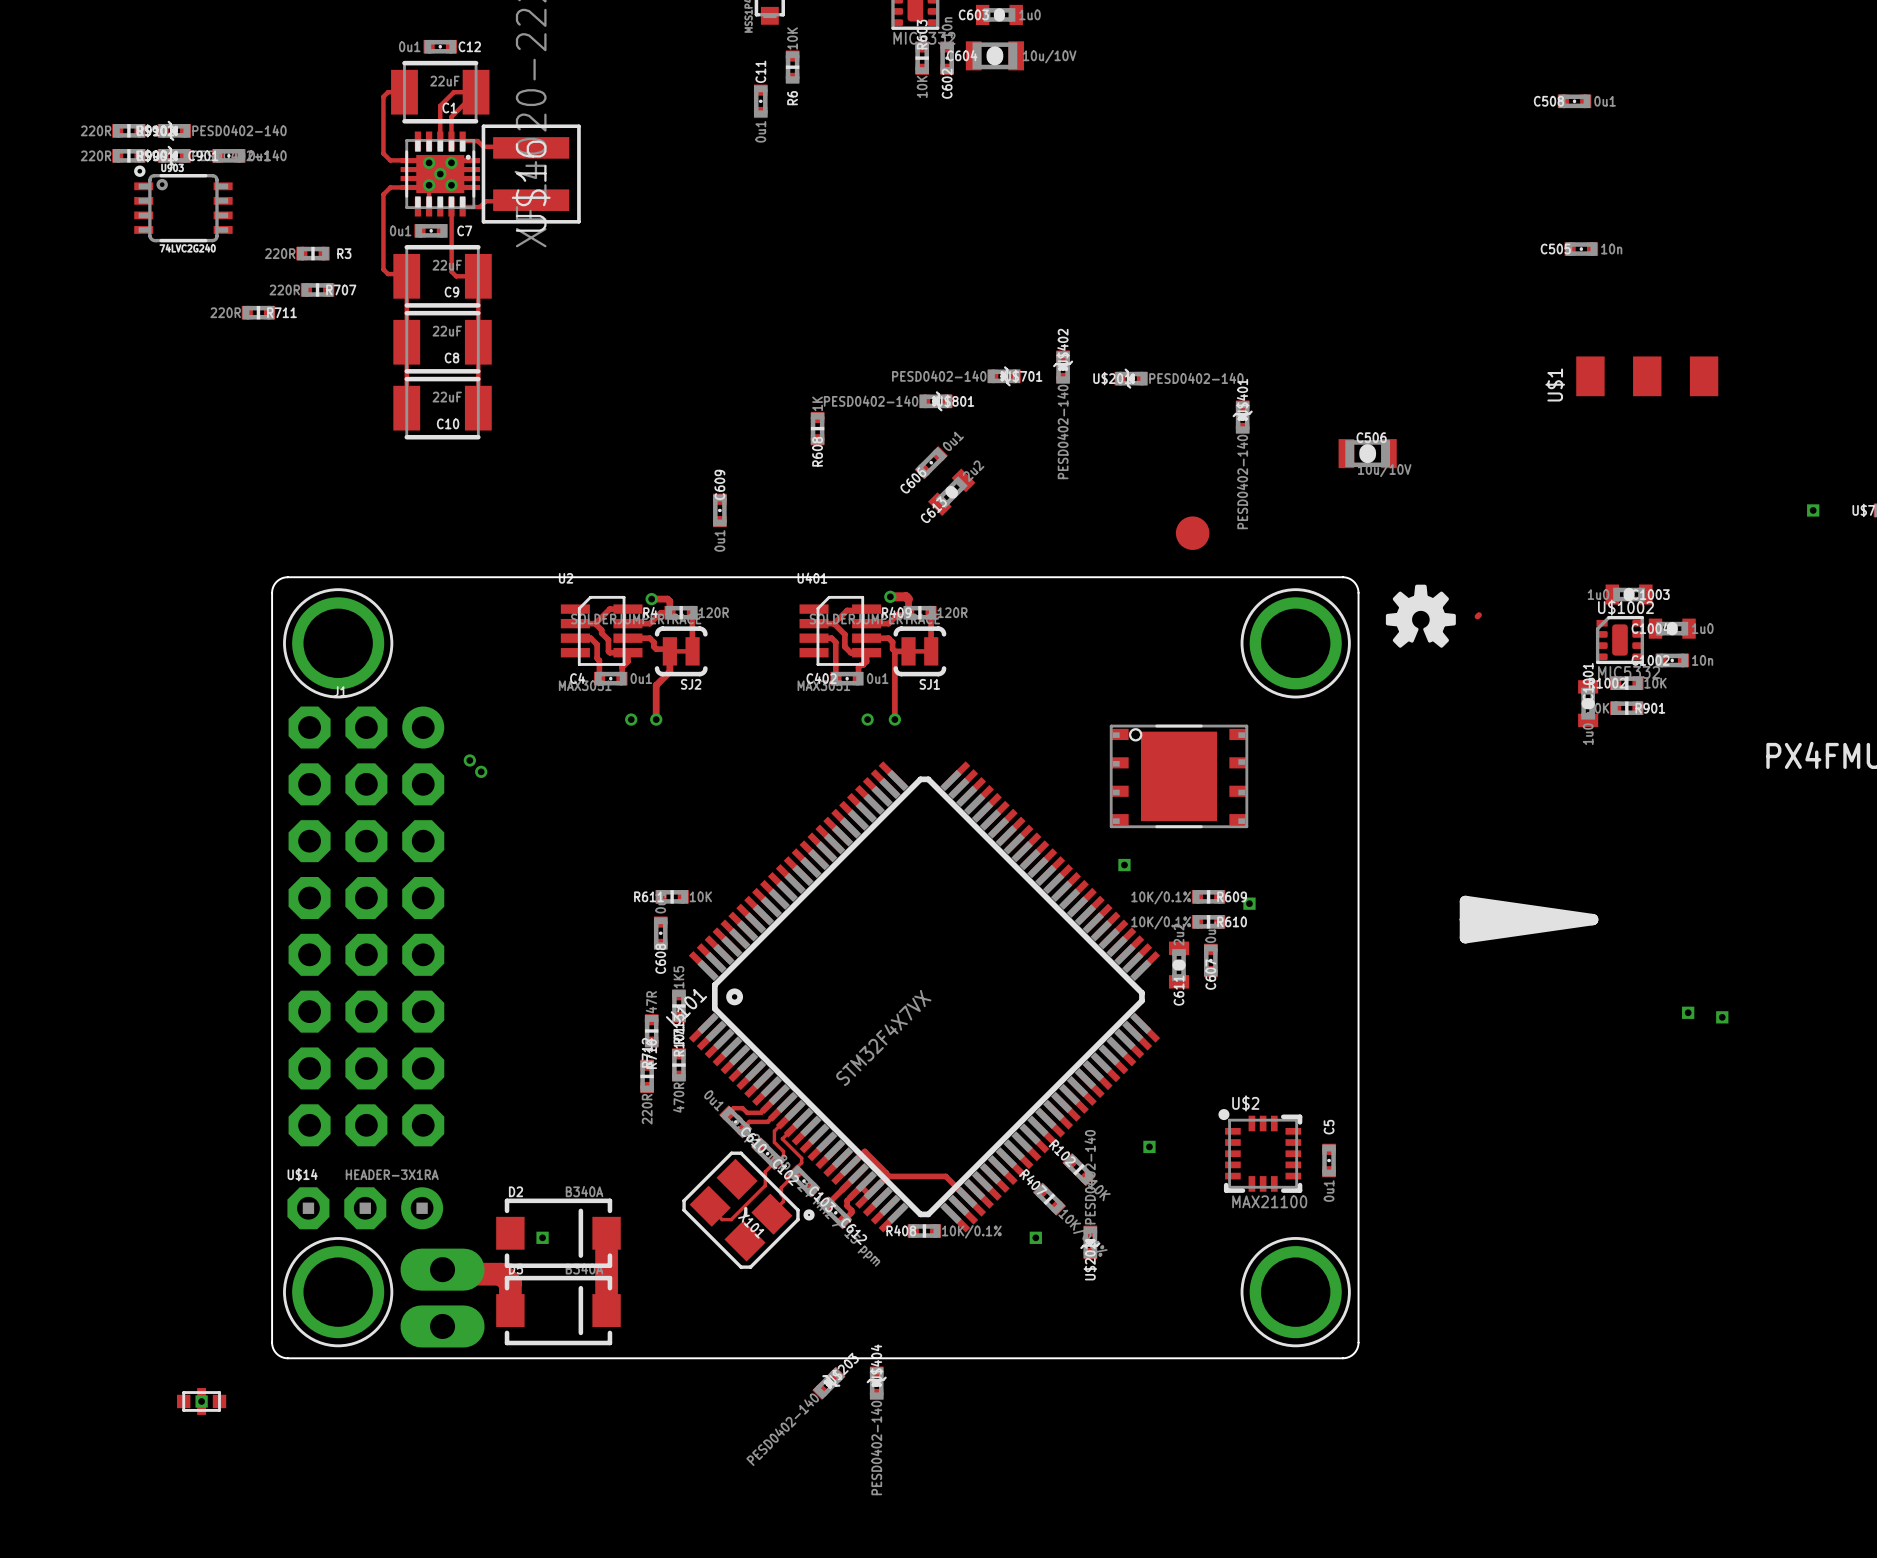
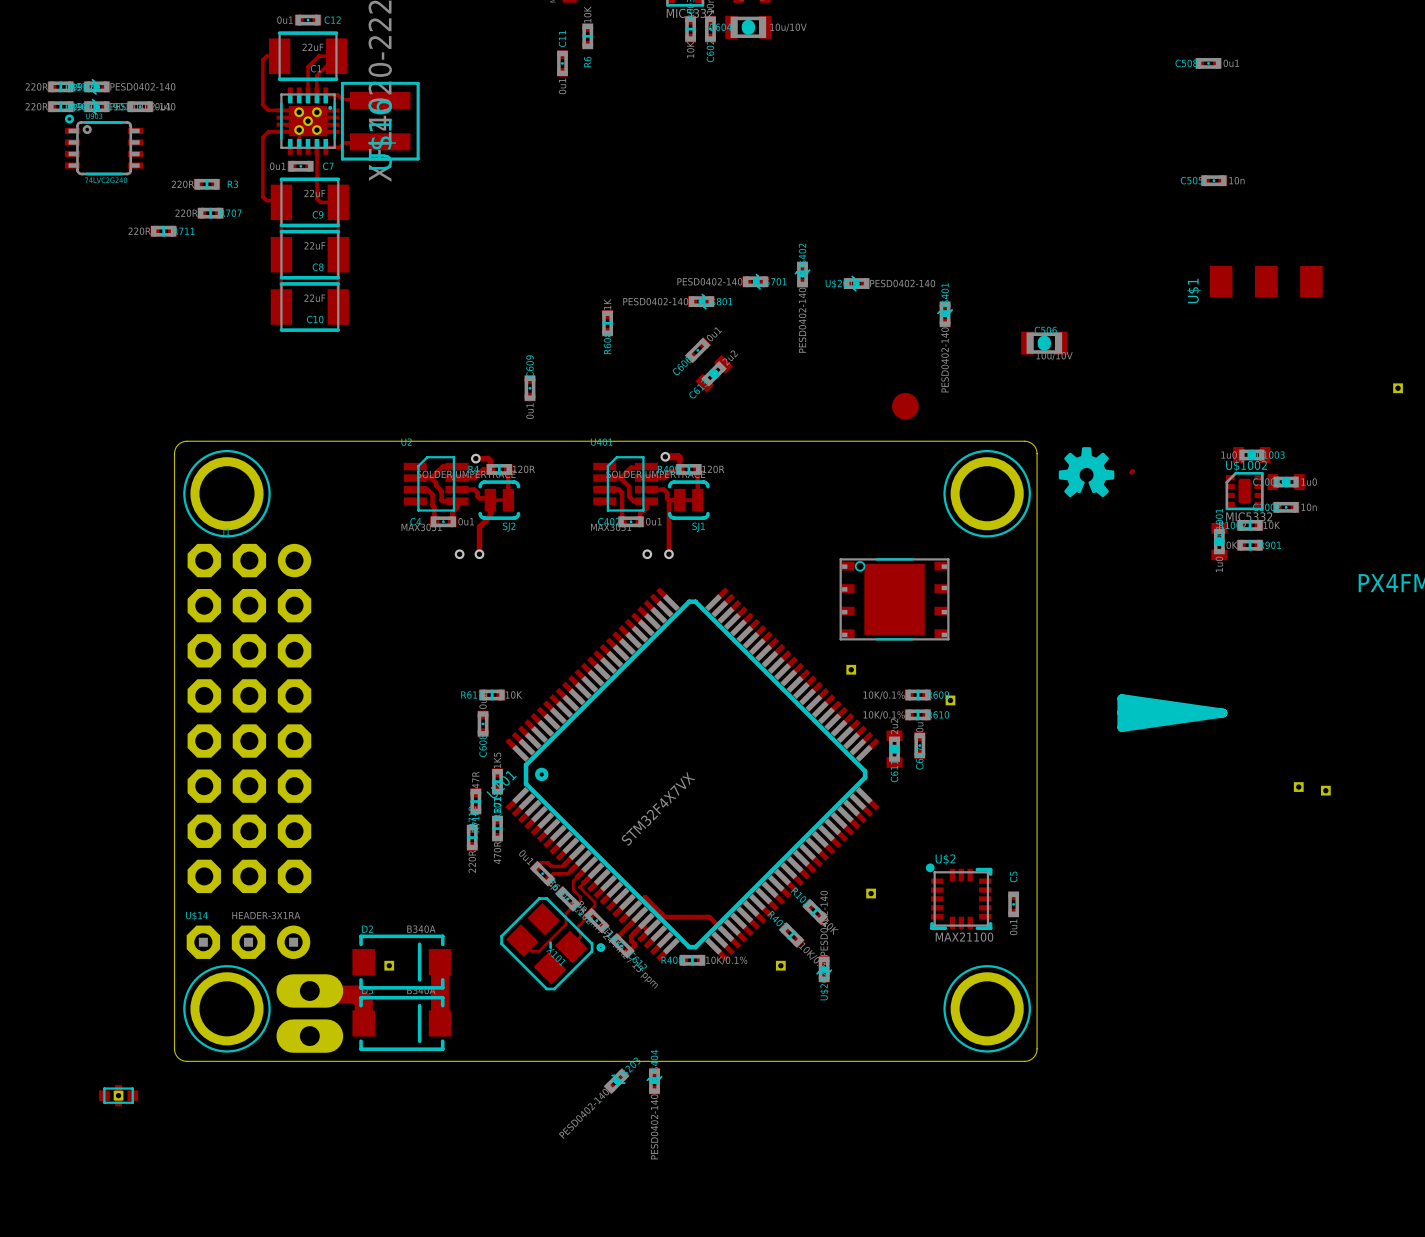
via: (469, 760) -> none
via: (481, 771) -> none

